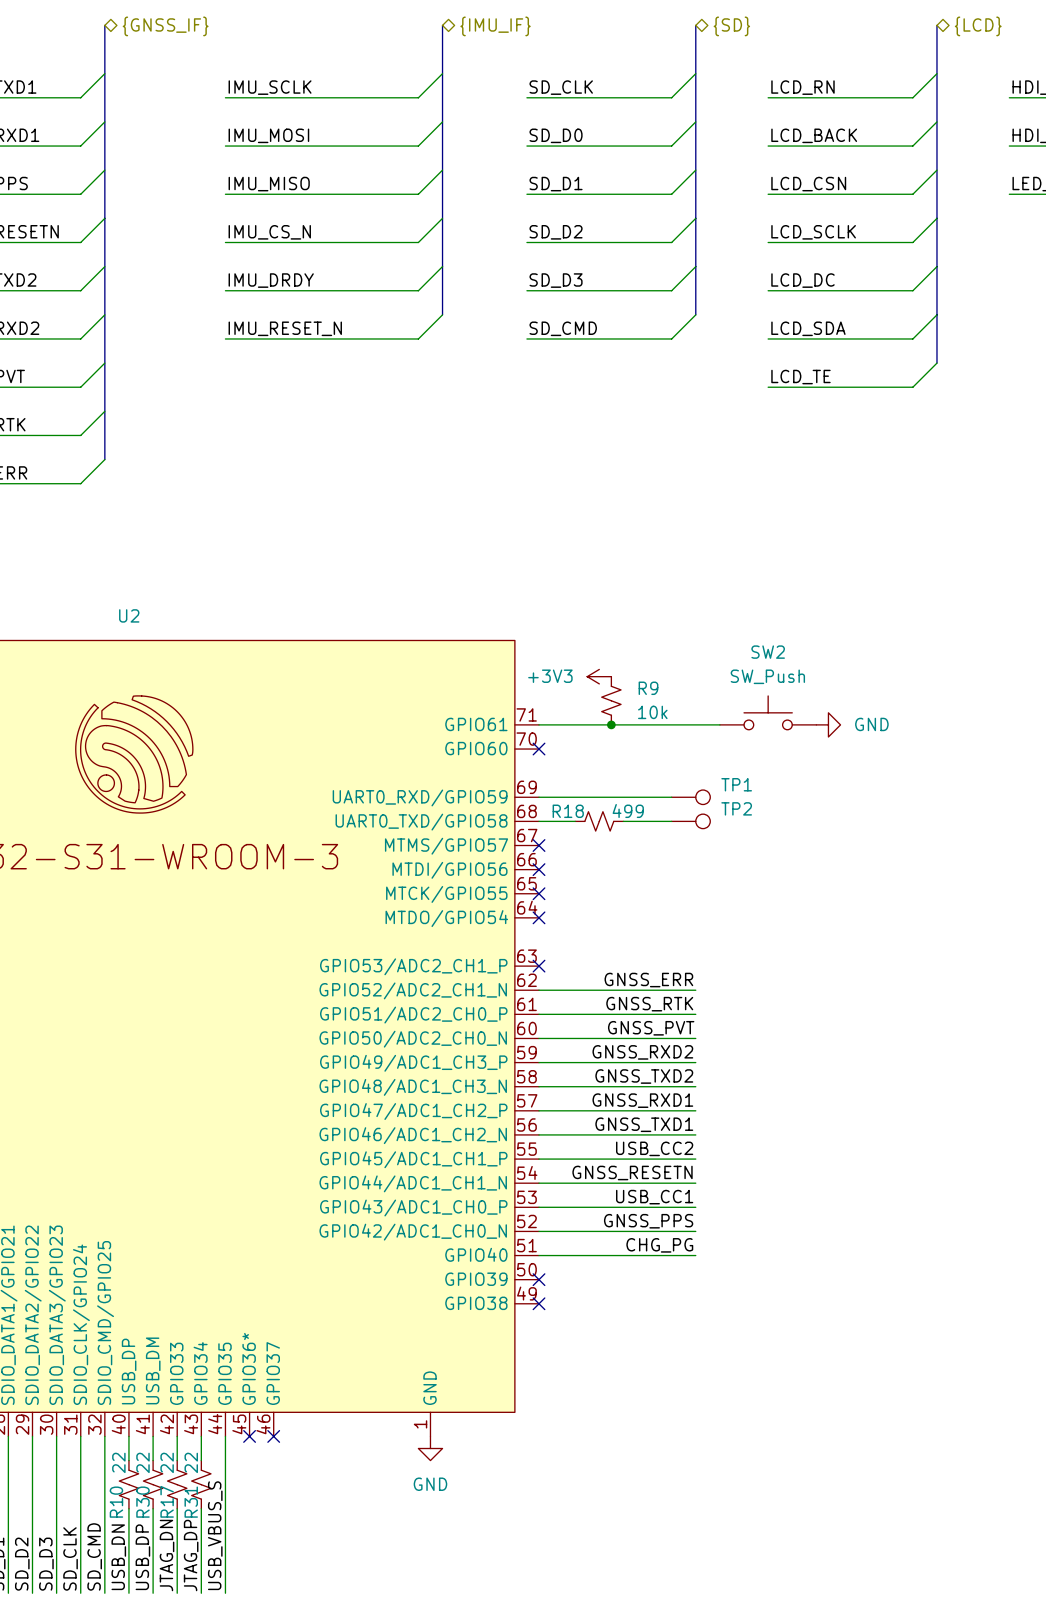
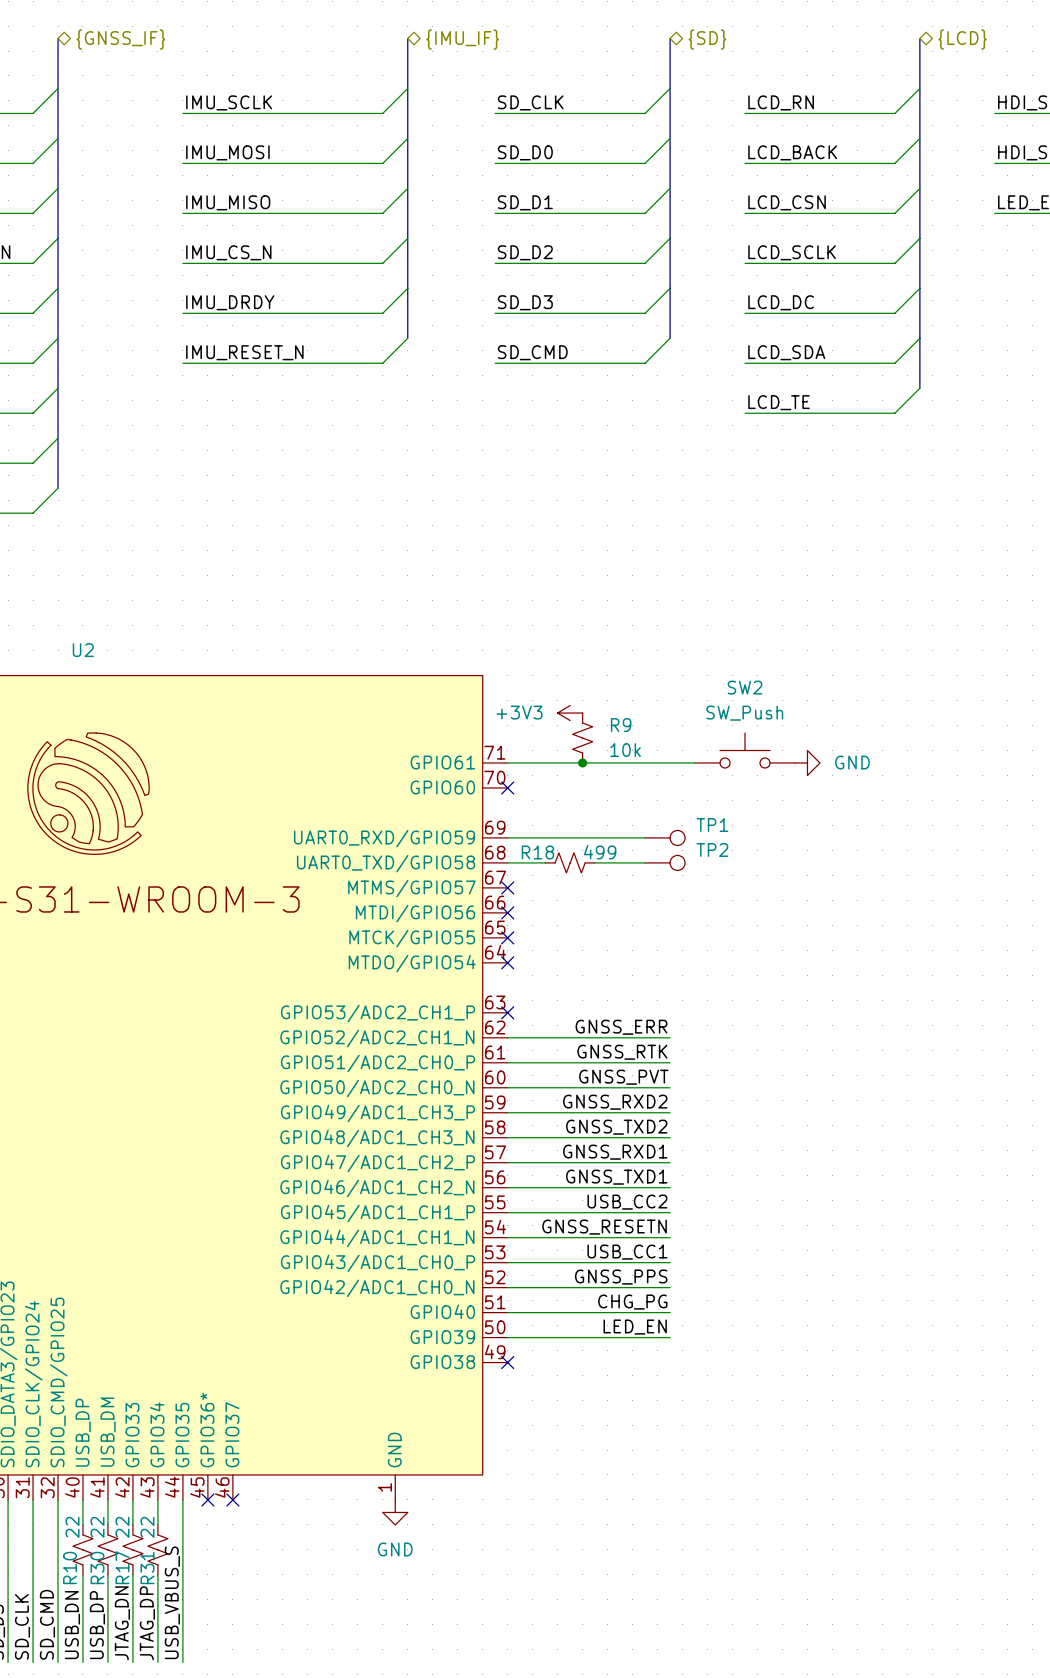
label: none -> LED_EN (635, 1327)
wire: none -> (507, 1337) (670, 1337)
no-connect mark: (539, 1279) -> none

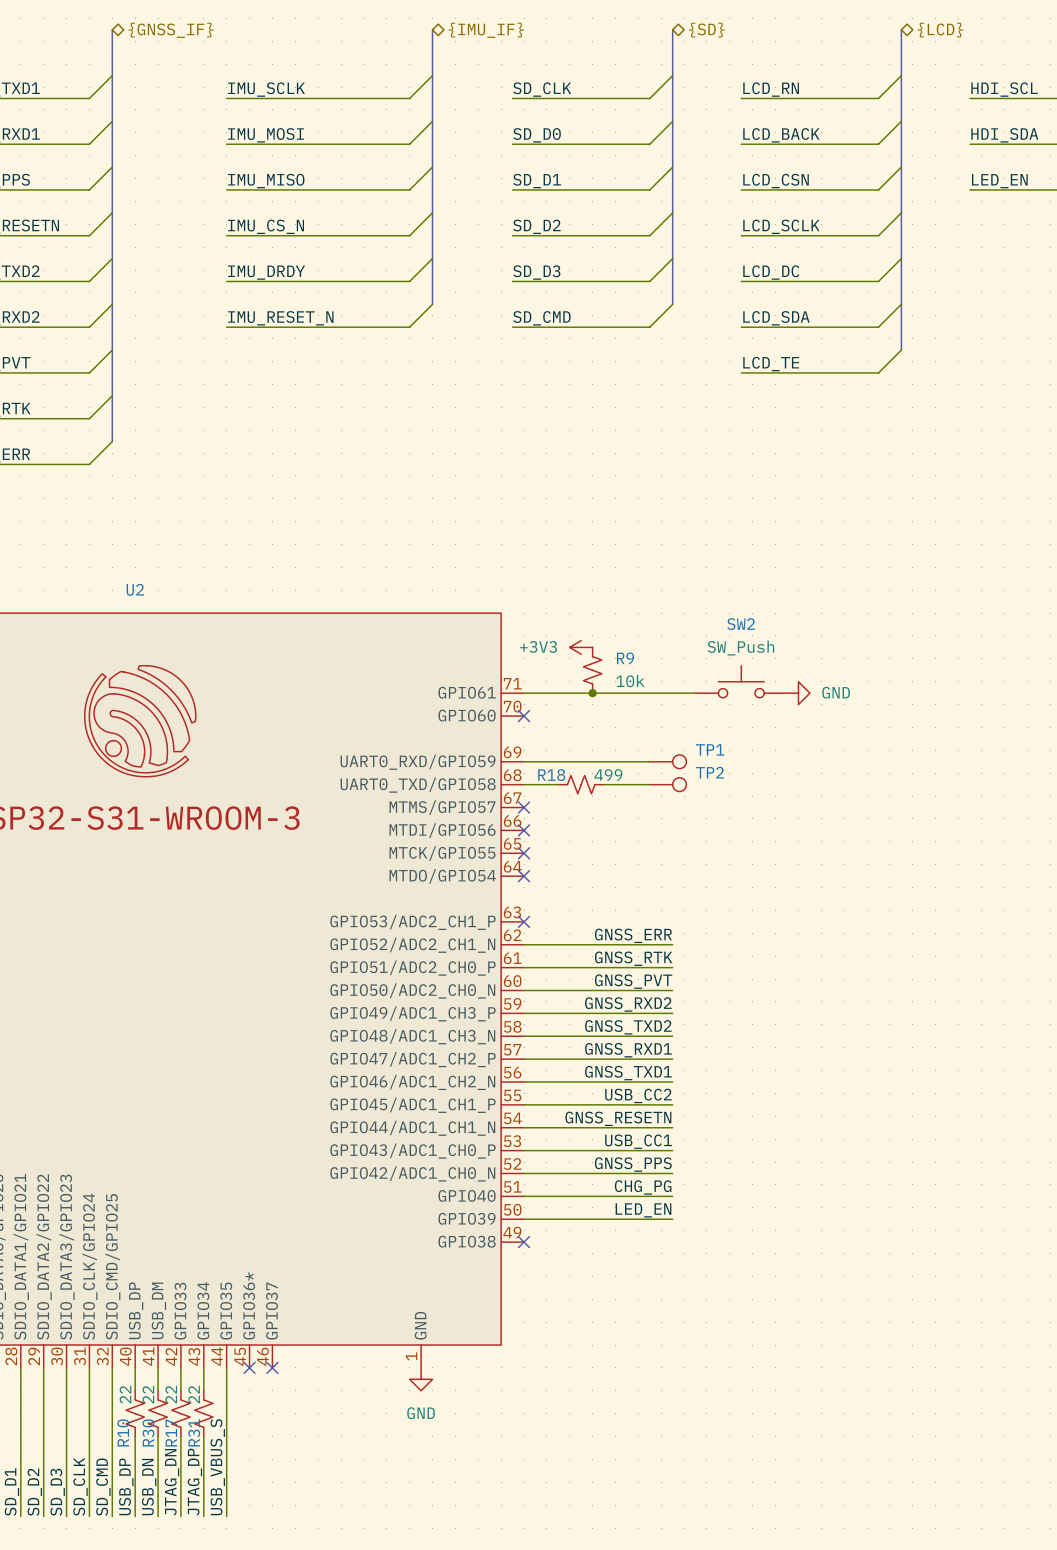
label: USB_DN (72, 1625) -> USB_DP (126, 1486)
label: USB_DP (97, 1625) -> USB_DN (149, 1487)

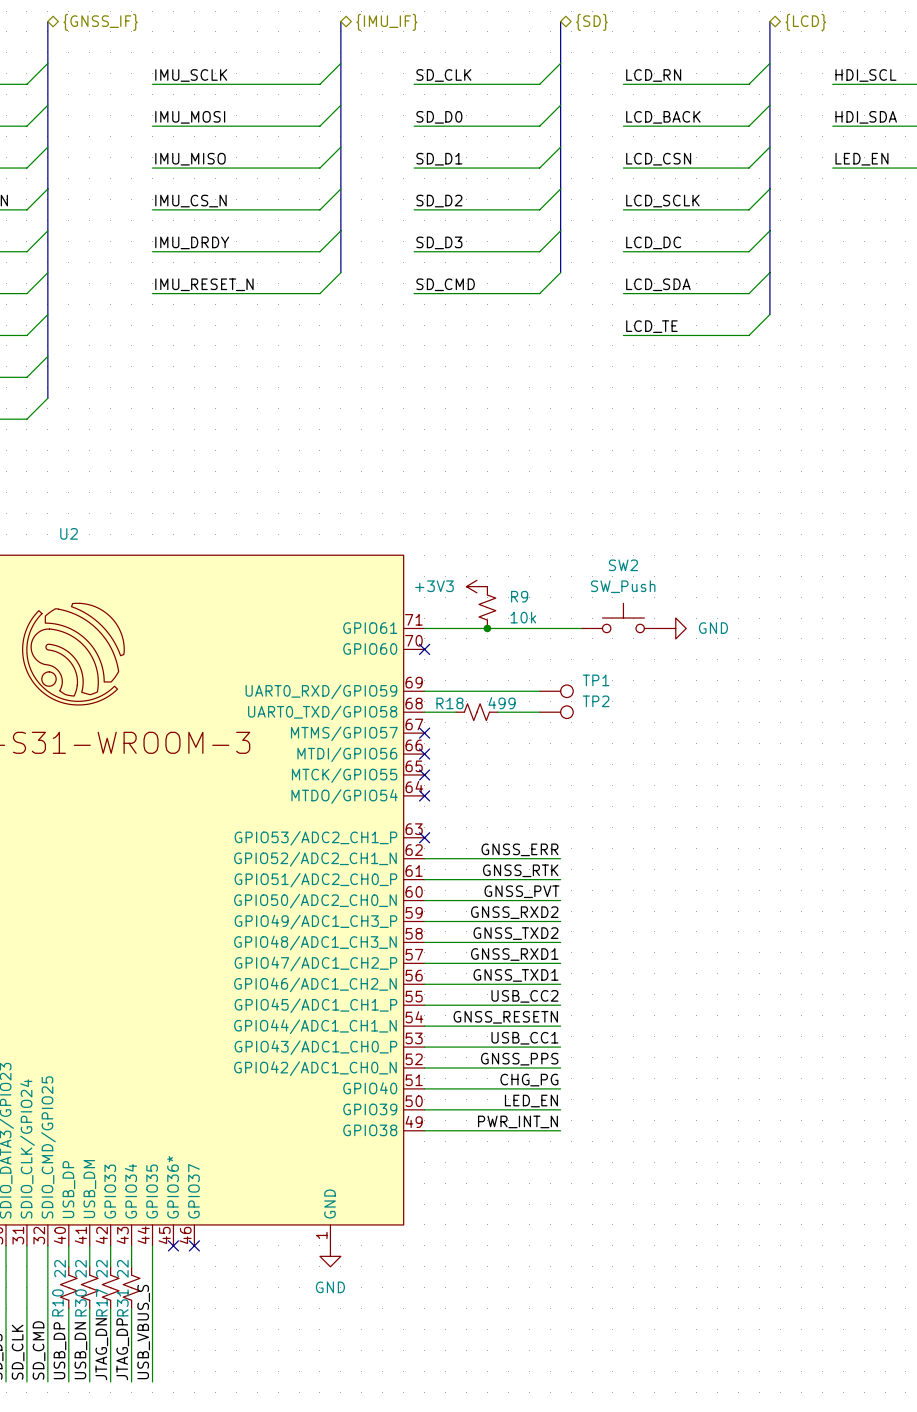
label: none -> PWR_INT_N (517, 1121)
wire: none -> (424, 1130) (560, 1130)
no-connect mark: (524, 1242) -> none

